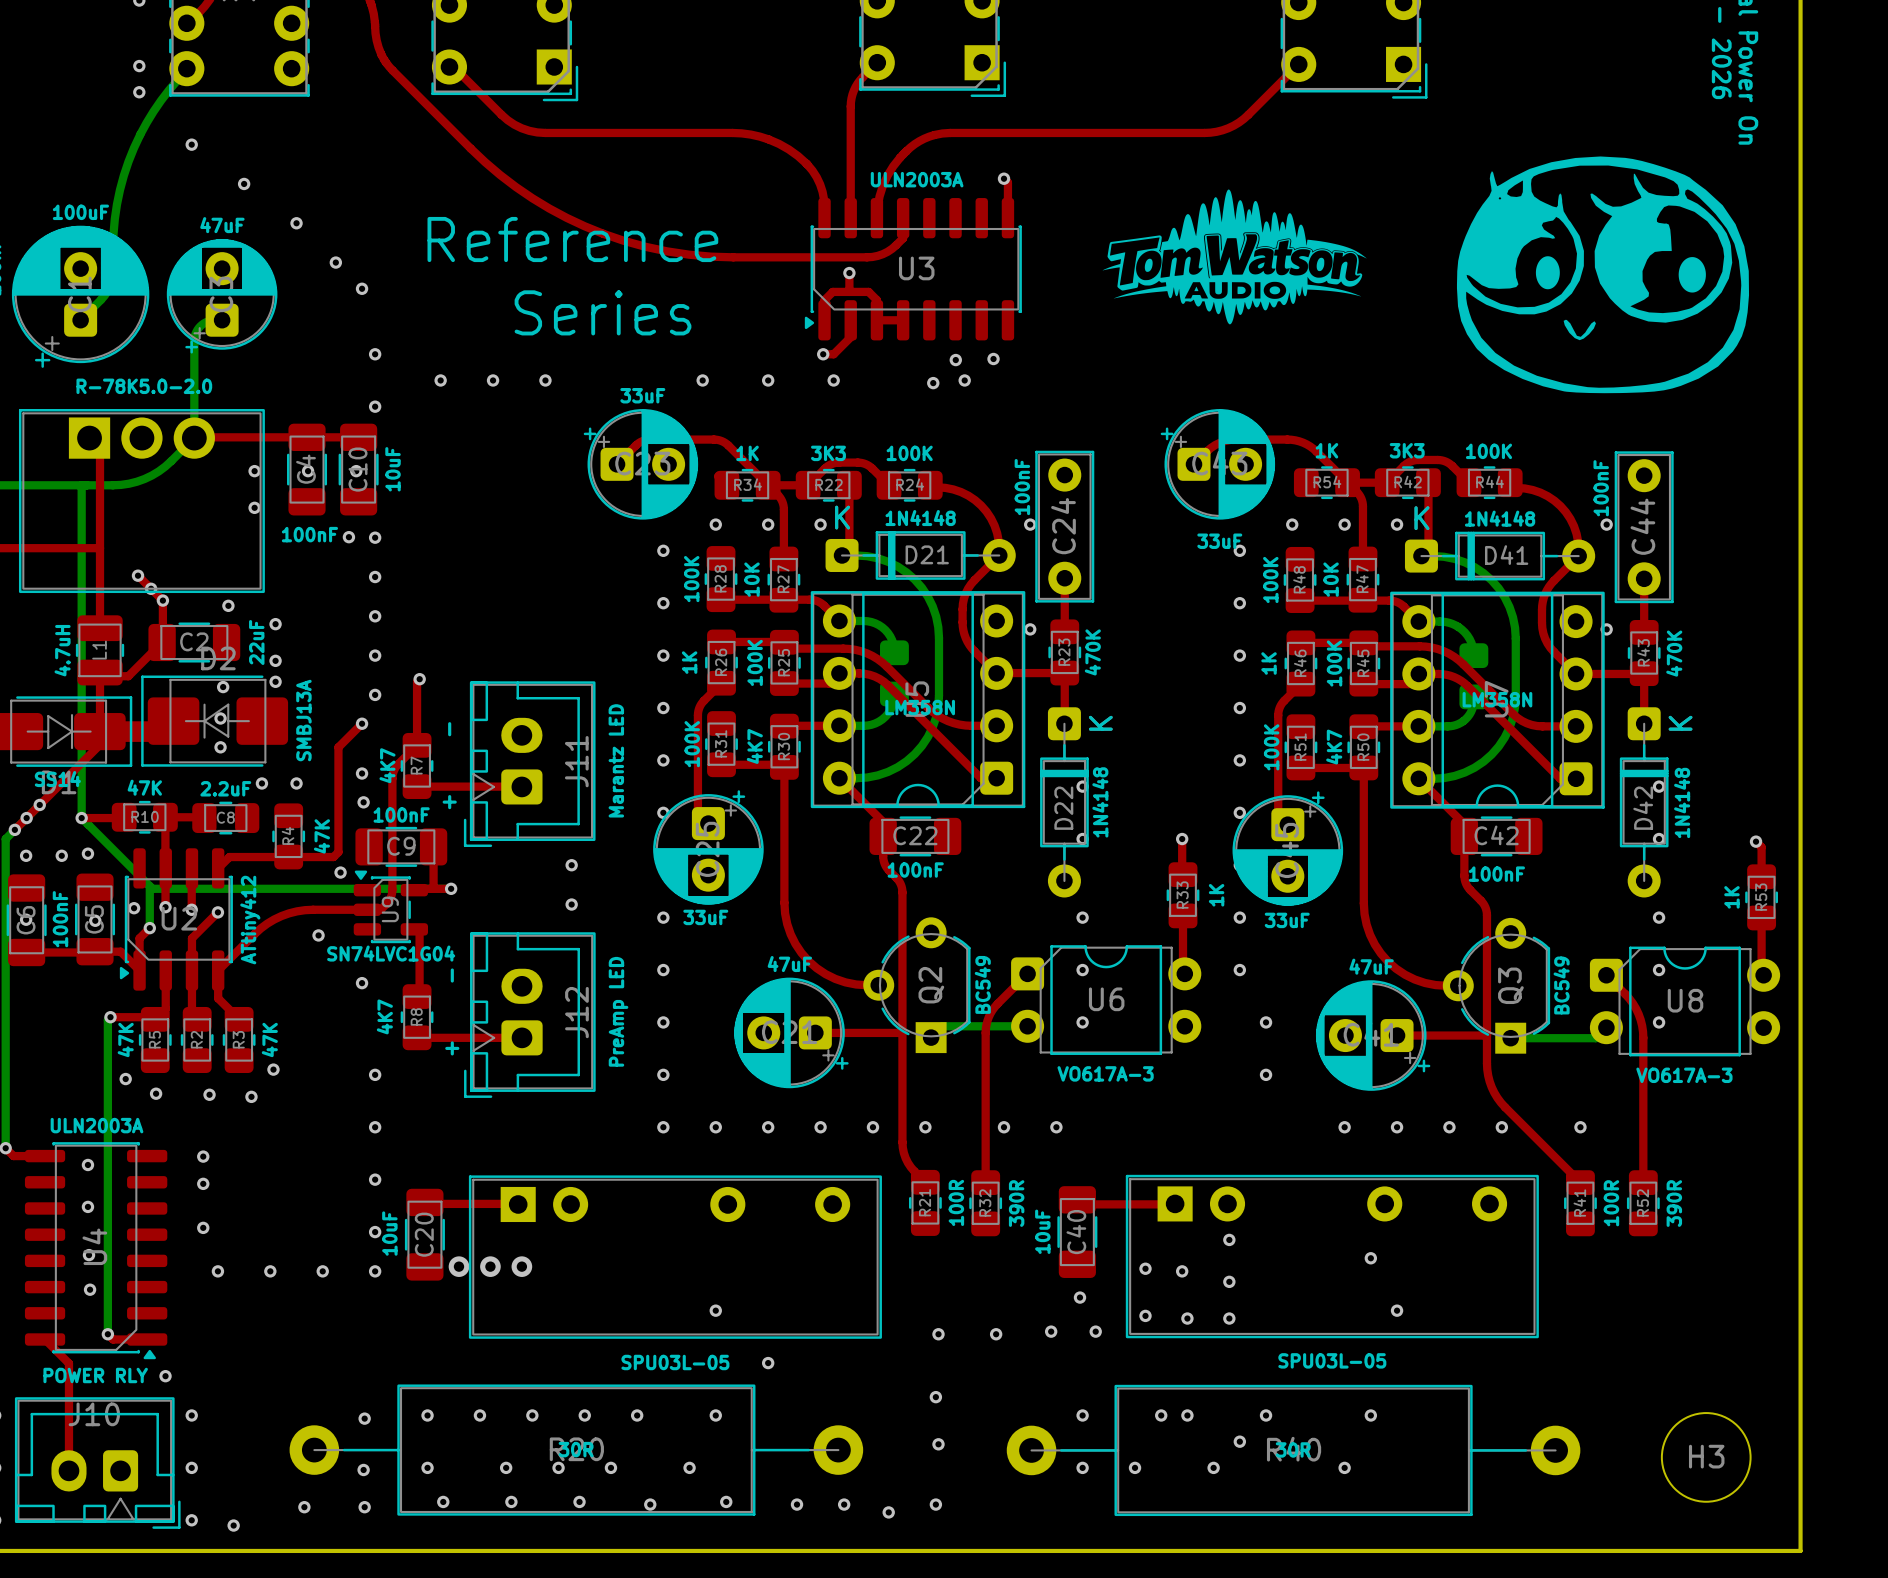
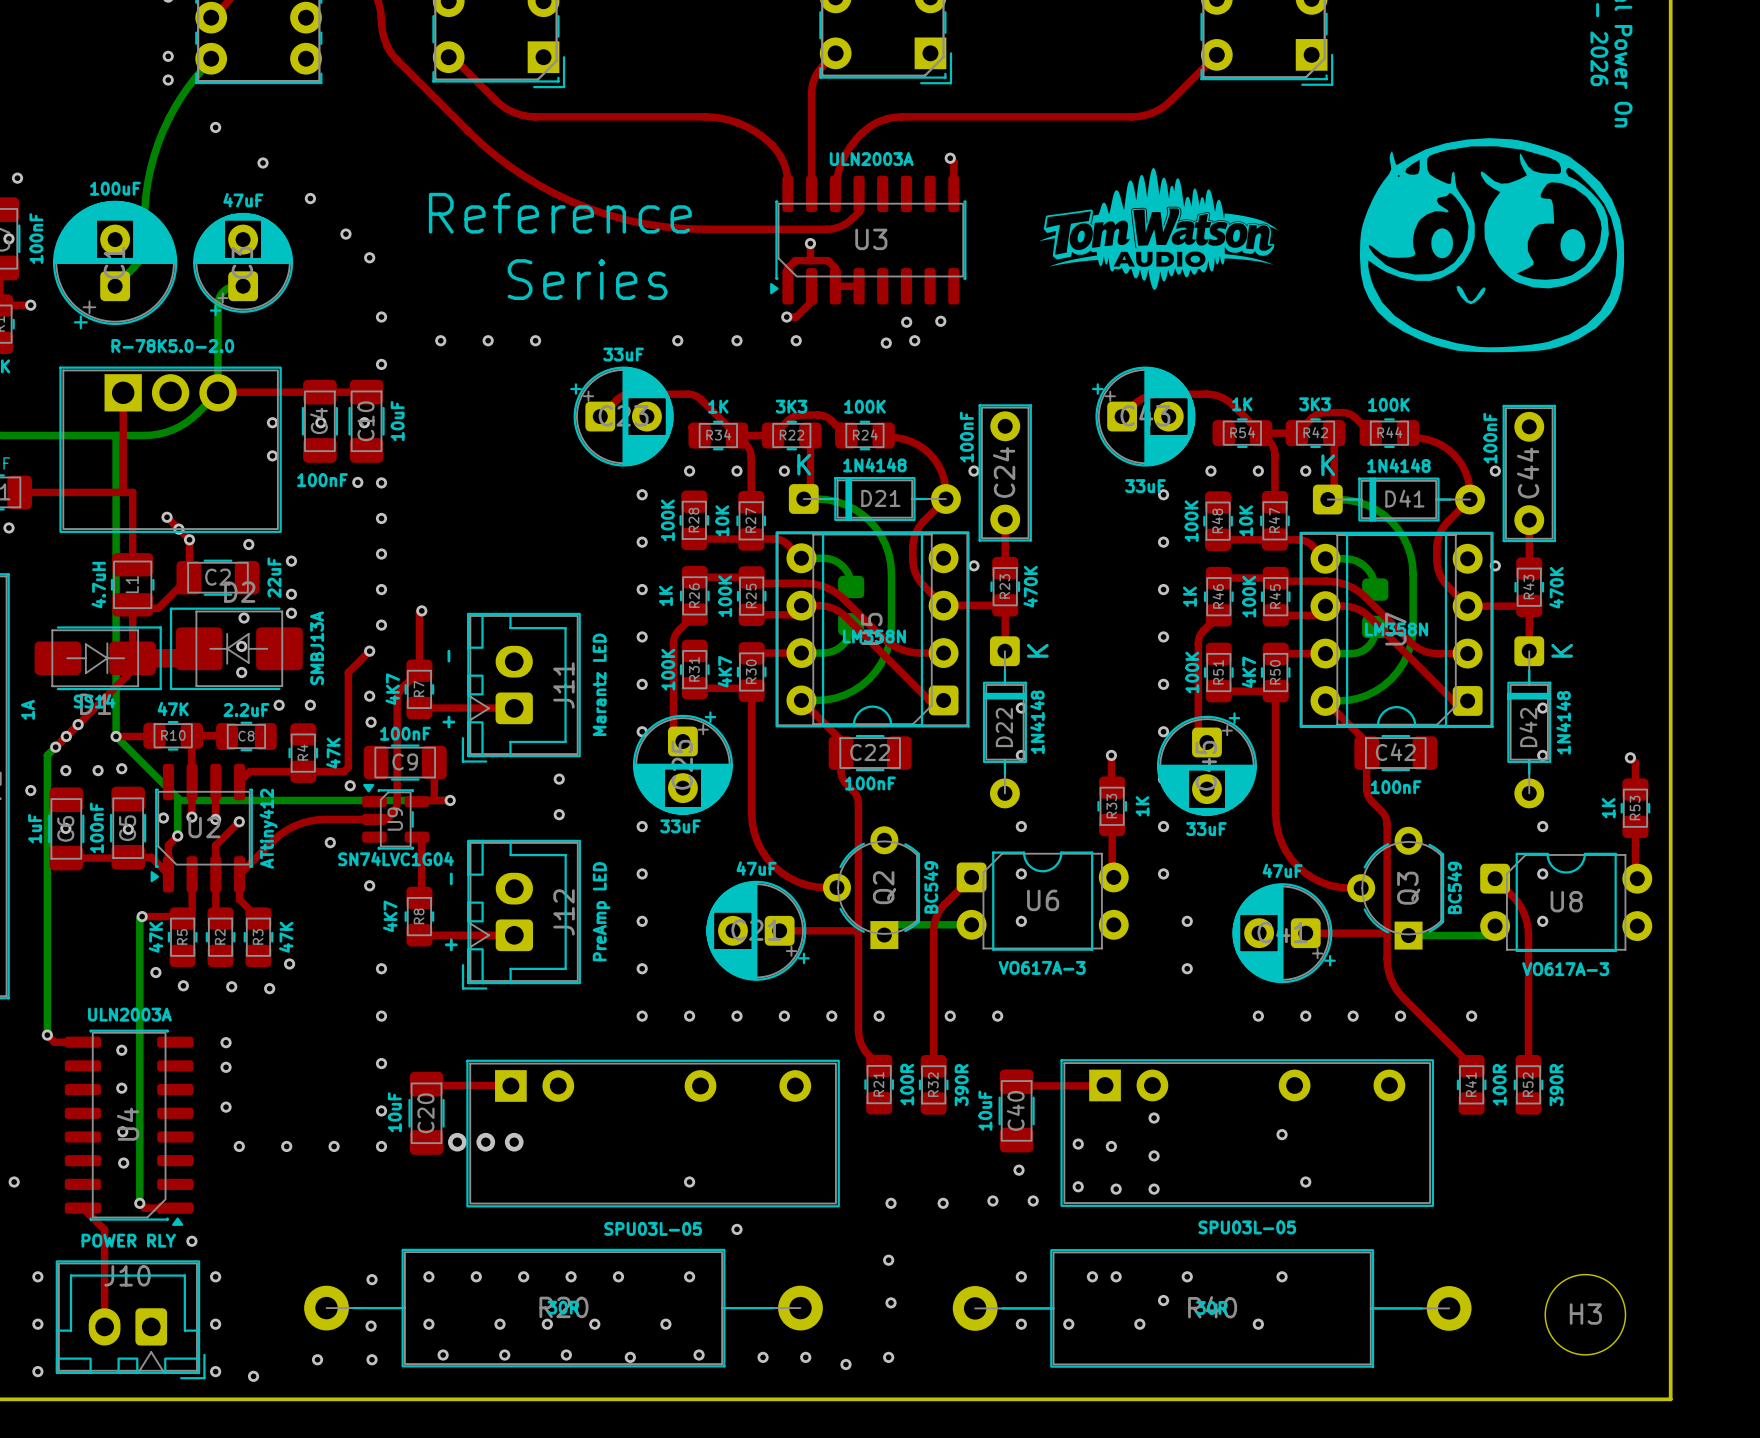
top track: none -> (123, 392) (123, 492)
top track: (100, 448) (100, 548) -> none

